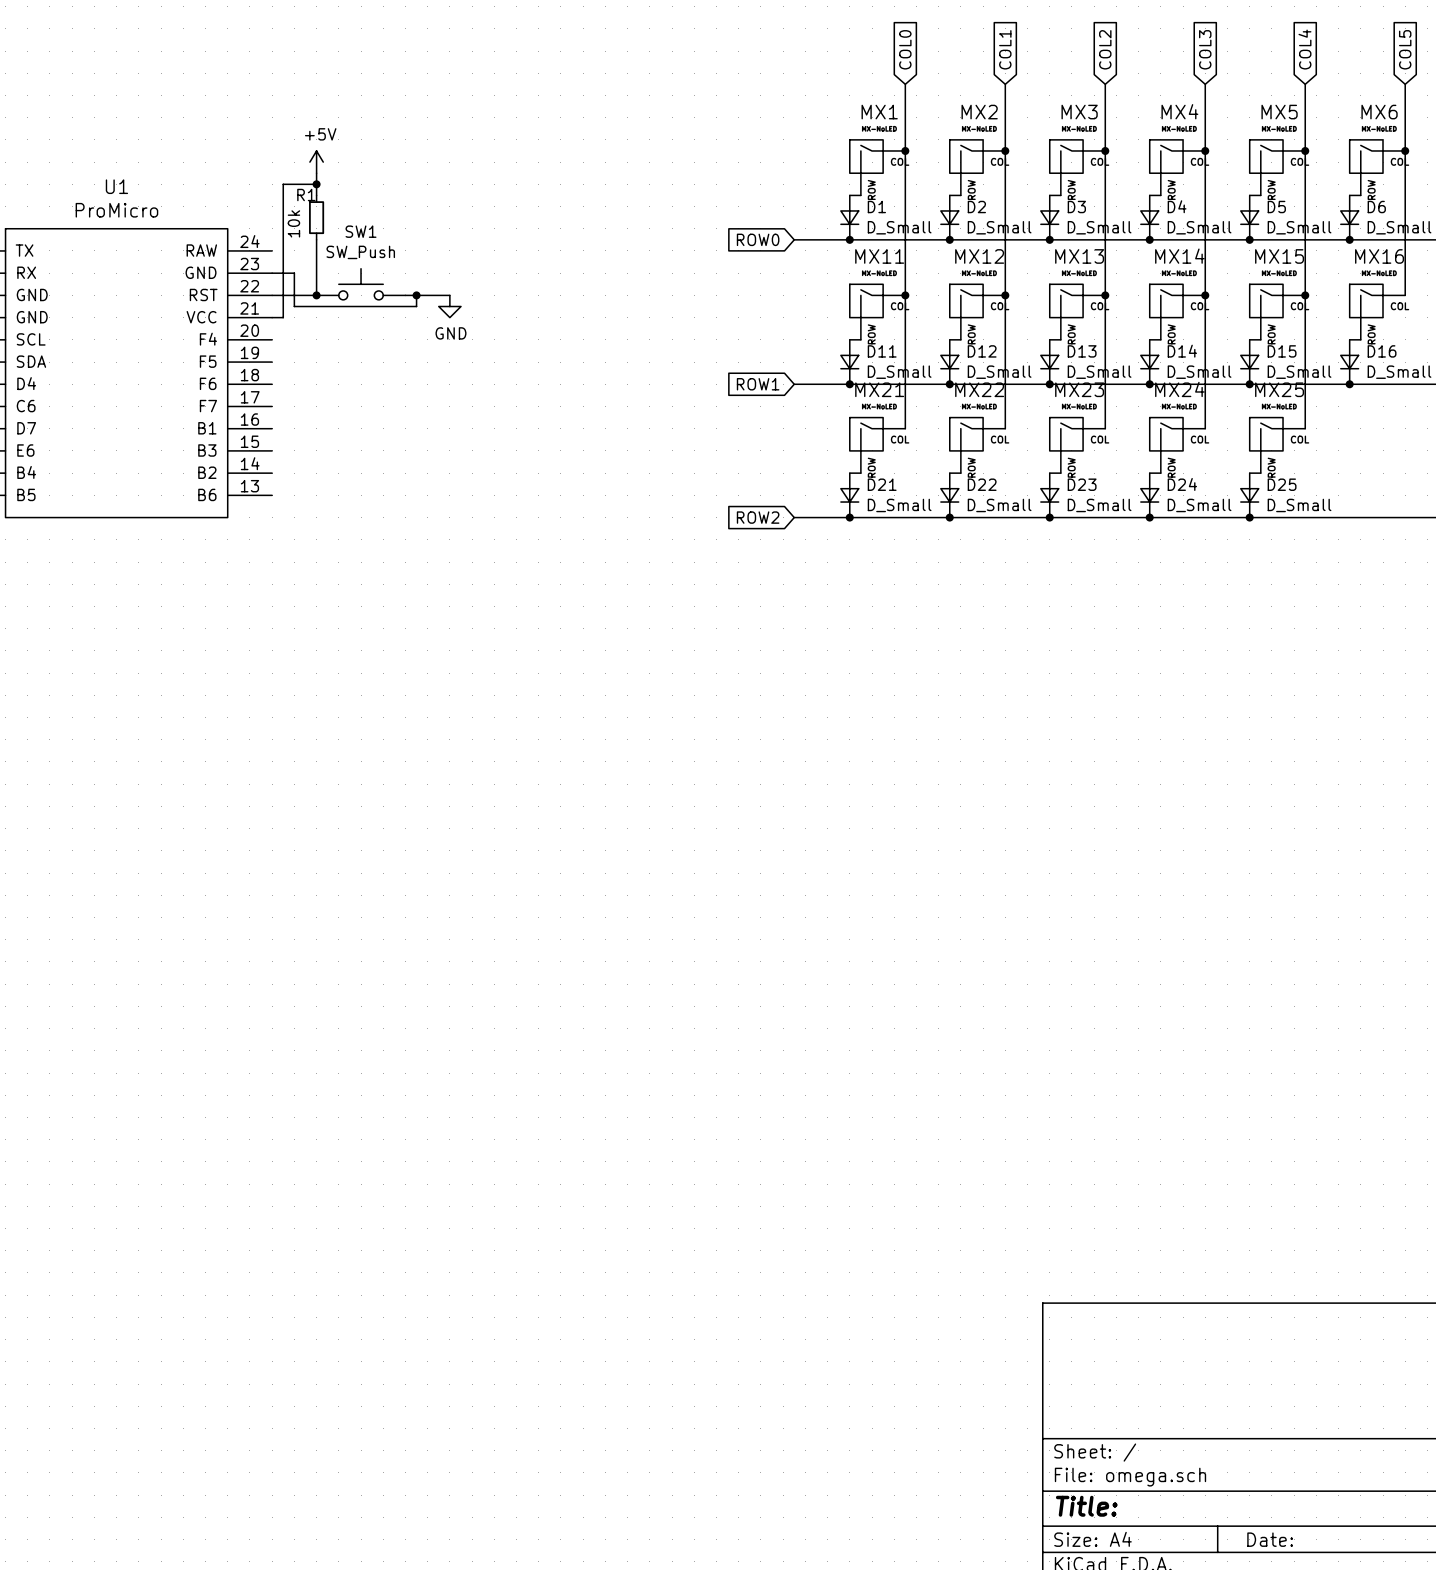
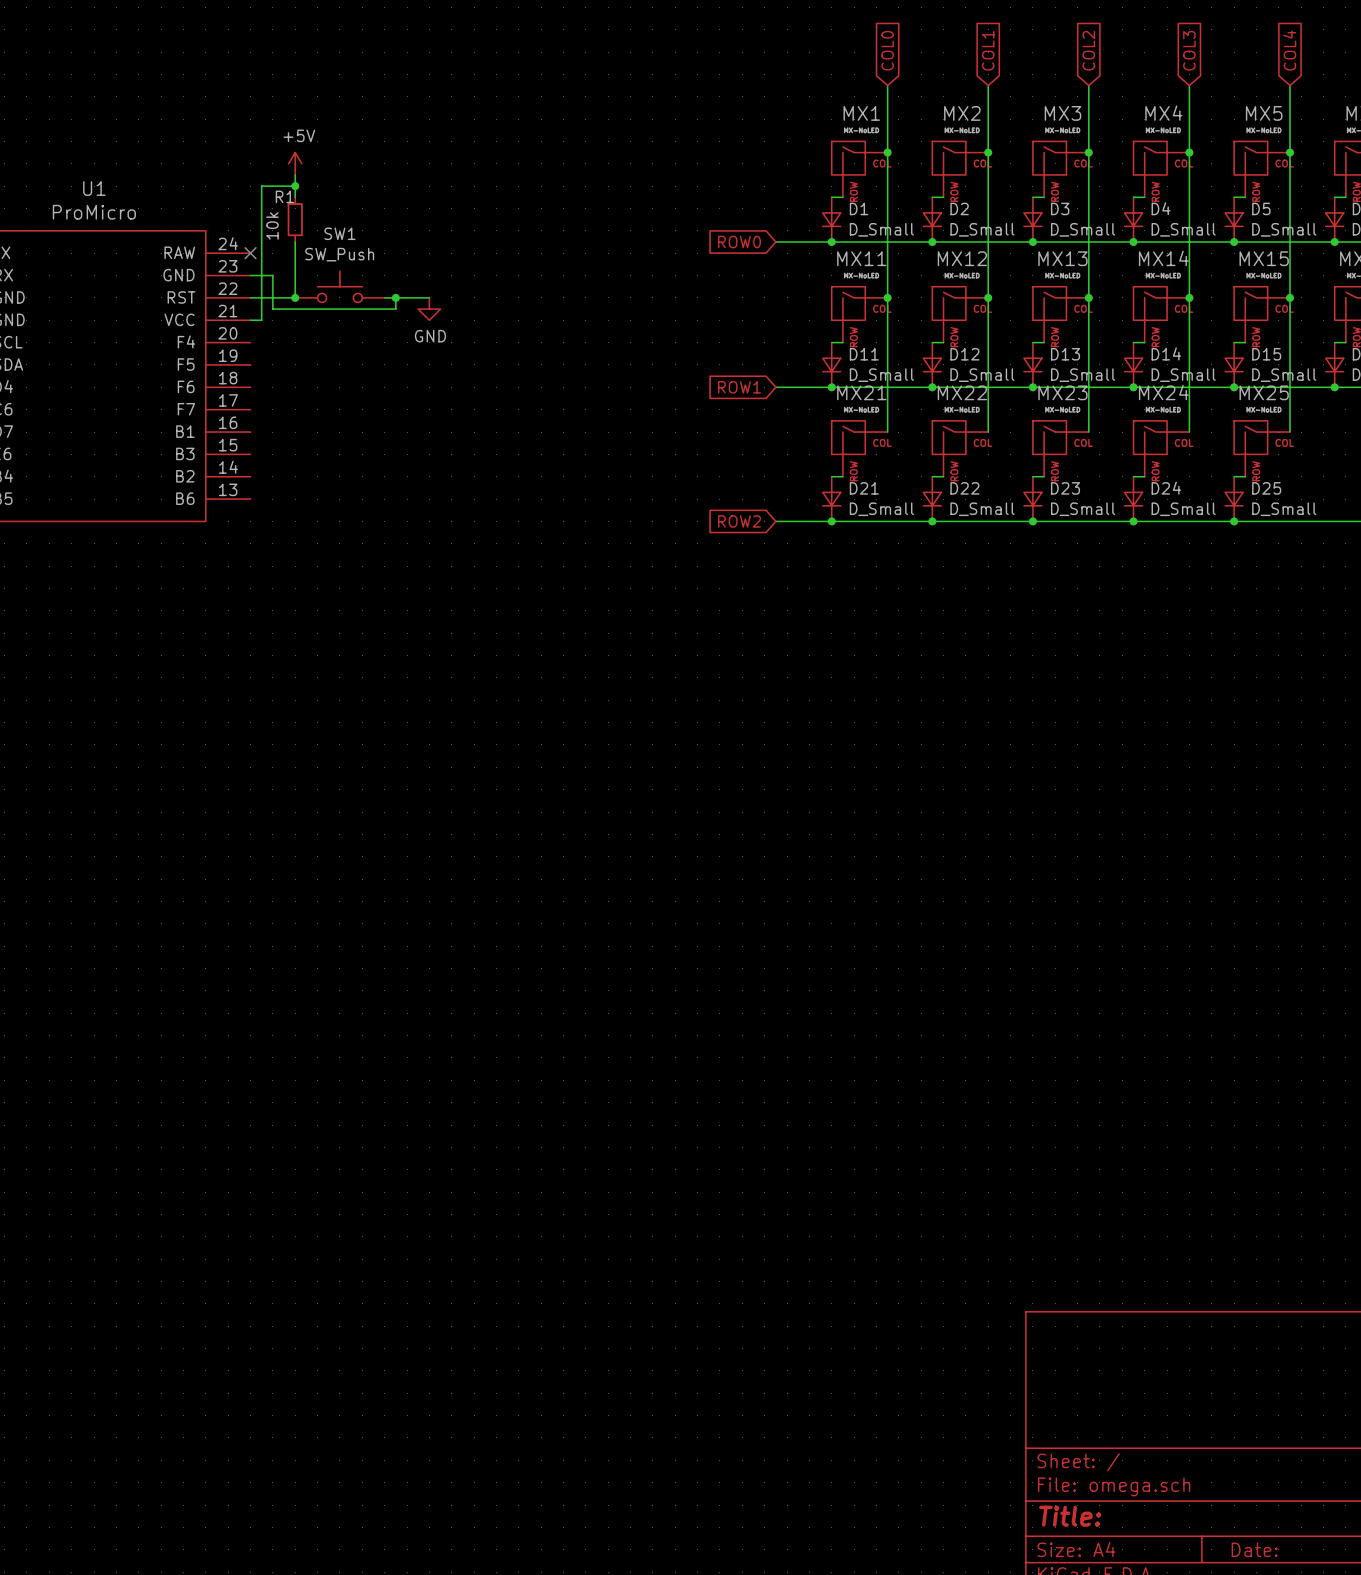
no-connect mark: none -> (250, 253)

